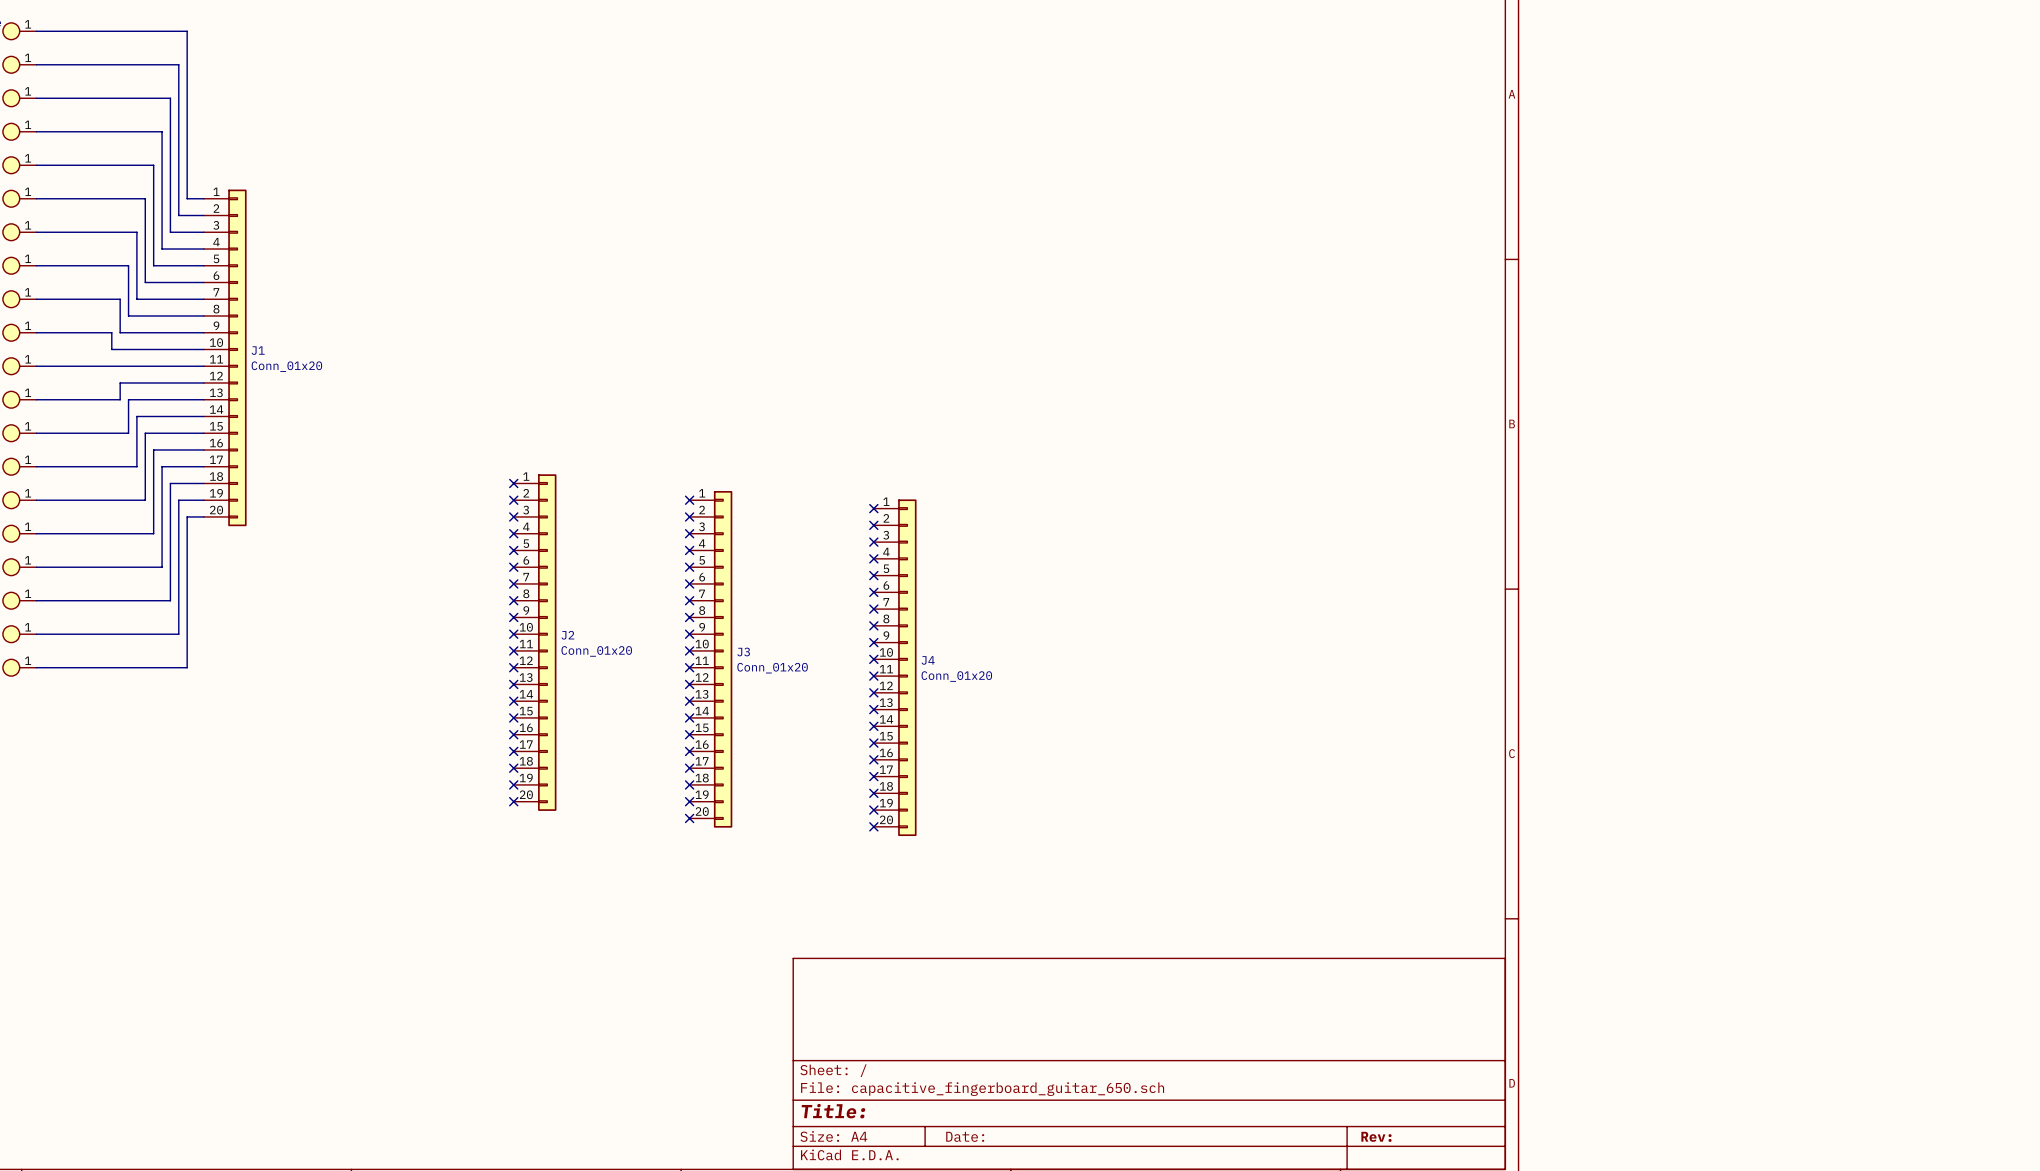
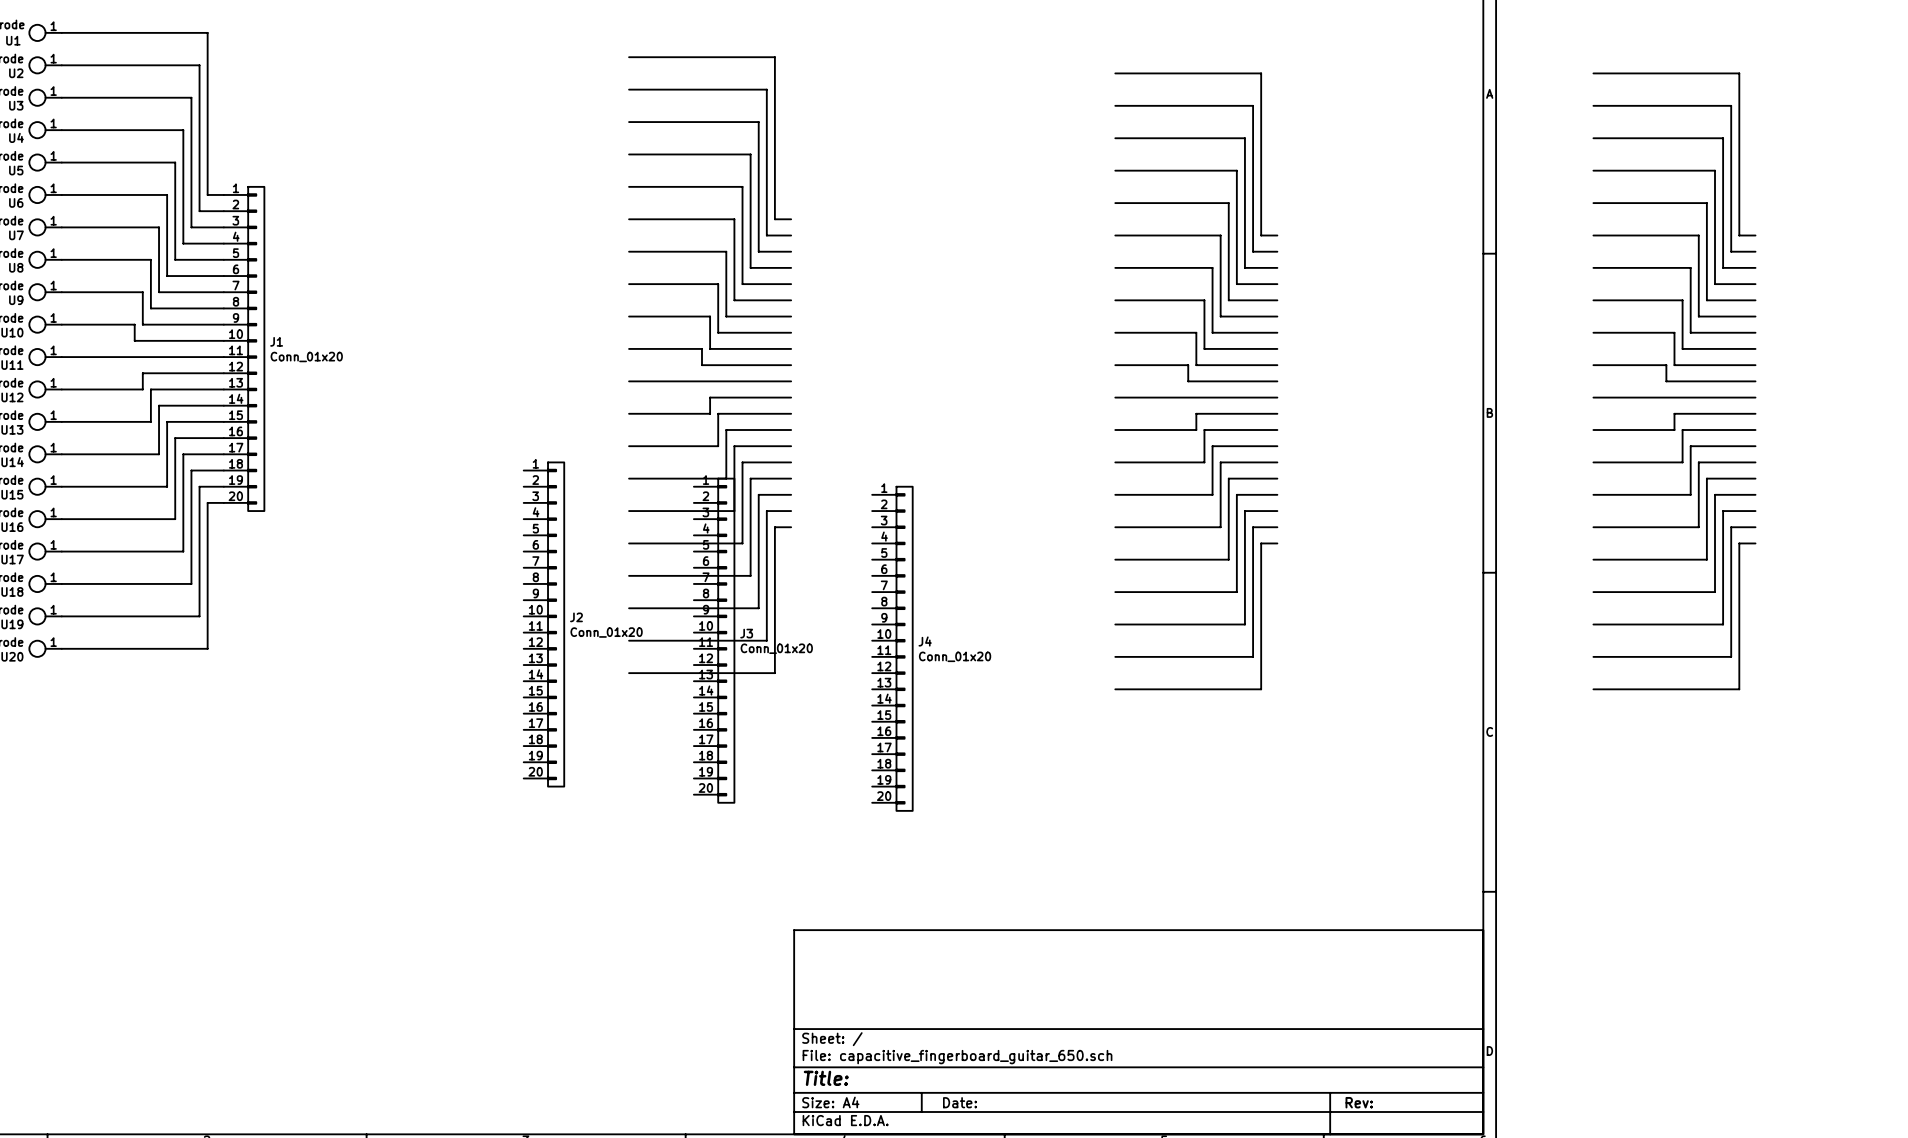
wire: none -> (629, 57) (774, 57) (774, 219) (791, 219)
wire: none -> (1115, 73) (1261, 73) (1261, 235) (1277, 235)
wire: none -> (1593, 73) (1739, 73) (1739, 235) (1755, 235)
wire: none -> (629, 89) (766, 89) (766, 235) (791, 235)
wire: none -> (1115, 105) (1253, 105) (1253, 251) (1277, 251)
wire: none -> (1593, 105) (1731, 105) (1731, 251) (1755, 251)
wire: none -> (629, 122) (758, 122) (758, 251) (791, 251)
wire: none -> (1115, 138) (1244, 138) (1244, 267) (1277, 267)
wire: none -> (1593, 138) (1723, 138) (1723, 267) (1755, 267)
wire: none -> (629, 154) (750, 154) (750, 267) (791, 267)
wire: none -> (1115, 170) (1236, 170) (1236, 284) (1277, 284)
wire: none -> (1593, 170) (1715, 170) (1715, 284) (1755, 284)
wire: none -> (629, 186) (742, 186) (742, 284) (791, 284)
wire: none -> (1115, 203) (1228, 203) (1228, 300) (1277, 300)
wire: none -> (1593, 203) (1706, 203) (1706, 300) (1755, 300)
wire: none -> (629, 219) (734, 219) (734, 300) (791, 300)
wire: none -> (1115, 235) (1220, 235) (1220, 316) (1277, 316)
wire: none -> (1593, 235) (1698, 235) (1698, 316) (1755, 316)
wire: none -> (629, 251) (726, 251) (726, 316) (791, 316)
wire: none -> (1115, 267) (1212, 267) (1212, 332) (1277, 332)
wire: none -> (1593, 267) (1690, 267) (1690, 332) (1755, 332)
wire: none -> (629, 284) (718, 284) (718, 332) (791, 332)
wire: none -> (1115, 300) (1204, 300) (1204, 348) (1277, 348)
wire: none -> (1593, 300) (1682, 300) (1682, 348) (1755, 348)
wire: none -> (629, 316) (710, 316) (710, 348) (791, 348)
wire: none -> (1115, 332) (1196, 332) (1196, 365) (1277, 365)
wire: none -> (1593, 332) (1674, 332) (1674, 365) (1755, 365)
wire: none -> (629, 348) (701, 348) (701, 365) (791, 365)
wire: none -> (1115, 365) (1188, 365) (1188, 381) (1277, 381)
wire: none -> (1593, 365) (1666, 365) (1666, 381) (1755, 381)
wire: none -> (629, 381) (791, 381)
wire: none -> (791, 397) (710, 397) (710, 413) (629, 413)
wire: none -> (1115, 397) (1277, 397)
wire: none -> (1593, 397) (1755, 397)
wire: none -> (791, 413) (718, 413) (718, 446) (629, 446)
wire: none -> (1277, 413) (1196, 413) (1196, 430) (1115, 430)
wire: none -> (1755, 413) (1674, 413) (1674, 430) (1593, 430)
wire: none -> (791, 430) (726, 430) (726, 478) (629, 478)
wire: none -> (1277, 430) (1204, 430) (1204, 462) (1115, 462)
wire: none -> (1755, 430) (1682, 430) (1682, 462) (1593, 462)
wire: none -> (791, 446) (734, 446) (734, 511) (629, 511)
wire: none -> (1277, 446) (1212, 446) (1212, 494) (1115, 494)
wire: none -> (1755, 446) (1690, 446) (1690, 494) (1593, 494)
wire: none -> (791, 462) (742, 462) (742, 543) (629, 543)
wire: none -> (1277, 462) (1220, 462) (1220, 527) (1115, 527)
wire: none -> (1755, 462) (1698, 462) (1698, 527) (1593, 527)
no-connect mark: (513, 483) -> none
wire: none -> (791, 478) (750, 478) (750, 575) (629, 575)
wire: none -> (1277, 478) (1228, 478) (1228, 559) (1115, 559)
wire: none -> (1755, 478) (1706, 478) (1706, 559) (1593, 559)
no-connect mark: (513, 500) -> none
no-connect mark: (689, 500) -> none
wire: none -> (791, 494) (758, 494) (758, 608) (629, 608)
no-connect mark: (873, 508) -> none
wire: none -> (1277, 494) (1236, 494) (1236, 592) (1115, 592)
wire: none -> (1755, 494) (1715, 494) (1715, 592) (1593, 592)
no-connect mark: (513, 516) -> none
no-connect mark: (689, 516) -> none
wire: none -> (791, 511) (766, 511) (766, 640) (629, 640)
no-connect mark: (873, 525) -> none
wire: none -> (1277, 511) (1244, 511) (1244, 624) (1115, 624)
wire: none -> (1755, 511) (1723, 511) (1723, 624) (1593, 624)
no-connect mark: (513, 533) -> none
no-connect mark: (689, 533) -> none
wire: none -> (791, 527) (774, 527) (774, 673) (629, 673)
no-connect mark: (873, 542) -> none
wire: none -> (1277, 527) (1253, 527) (1253, 656) (1115, 656)
wire: none -> (1755, 527) (1731, 527) (1731, 656) (1593, 656)
no-connect mark: (513, 550) -> none
no-connect mark: (689, 550) -> none
no-connect mark: (873, 558) -> none
wire: none -> (1277, 543) (1261, 543) (1261, 689) (1115, 689)
wire: none -> (1755, 543) (1739, 543) (1739, 689) (1593, 689)
no-connect mark: (513, 567) -> none
no-connect mark: (689, 567) -> none
no-connect mark: (873, 575) -> none
no-connect mark: (513, 583) -> none
no-connect mark: (689, 583) -> none
no-connect mark: (873, 592) -> none
no-connect mark: (513, 600) -> none
no-connect mark: (689, 600) -> none
no-connect mark: (873, 609) -> none
no-connect mark: (513, 617) -> none
no-connect mark: (689, 617) -> none
no-connect mark: (873, 625) -> none
no-connect mark: (513, 634) -> none
no-connect mark: (689, 634) -> none
no-connect mark: (873, 642) -> none
no-connect mark: (513, 650) -> none
no-connect mark: (689, 650) -> none
no-connect mark: (873, 659) -> none
no-connect mark: (513, 667) -> none
no-connect mark: (689, 667) -> none
no-connect mark: (873, 676) -> none
no-connect mark: (513, 684) -> none
no-connect mark: (689, 684) -> none
no-connect mark: (873, 692) -> none
no-connect mark: (513, 701) -> none
no-connect mark: (689, 701) -> none
no-connect mark: (873, 709) -> none
no-connect mark: (513, 717) -> none
no-connect mark: (689, 717) -> none
no-connect mark: (873, 726) -> none
no-connect mark: (513, 734) -> none
no-connect mark: (689, 734) -> none
no-connect mark: (873, 743) -> none
no-connect mark: (513, 751) -> none
no-connect mark: (689, 751) -> none
no-connect mark: (873, 759) -> none
no-connect mark: (513, 768) -> none
no-connect mark: (689, 768) -> none
no-connect mark: (873, 776) -> none
no-connect mark: (513, 784) -> none
no-connect mark: (689, 784) -> none
no-connect mark: (873, 793) -> none
no-connect mark: (513, 801) -> none
no-connect mark: (689, 801) -> none
no-connect mark: (873, 810) -> none
no-connect mark: (689, 818) -> none
no-connect mark: (873, 826) -> none

